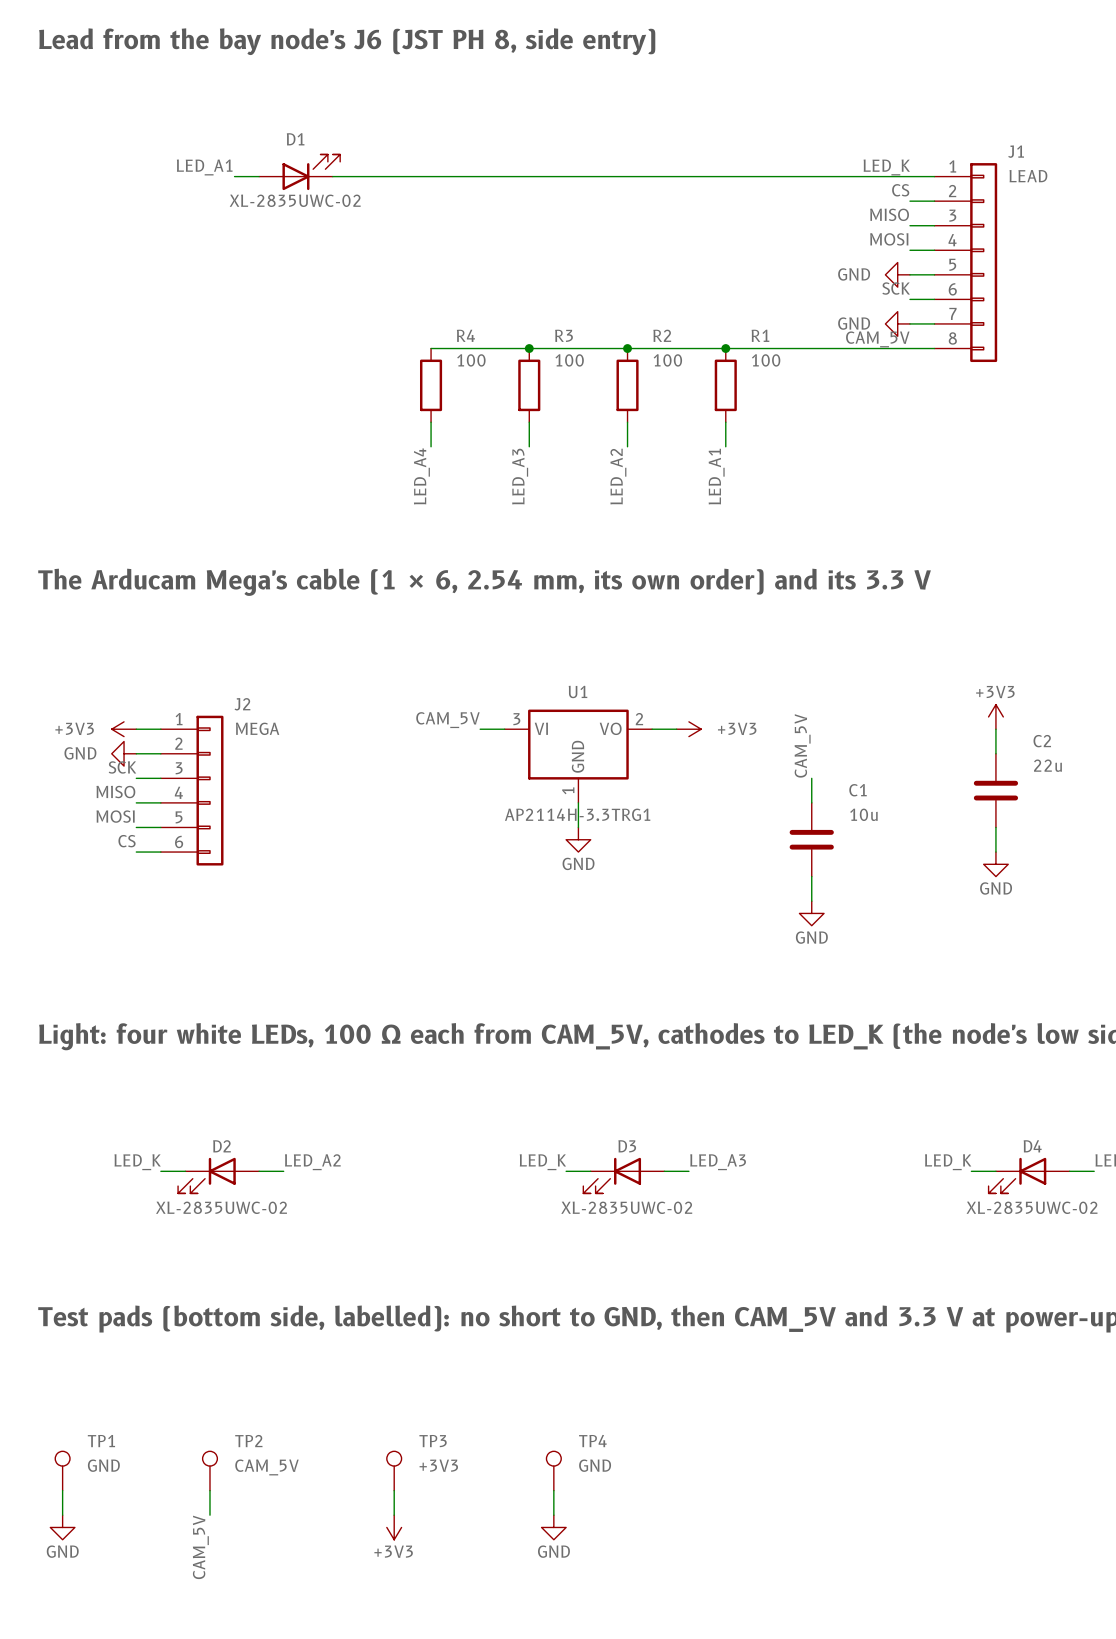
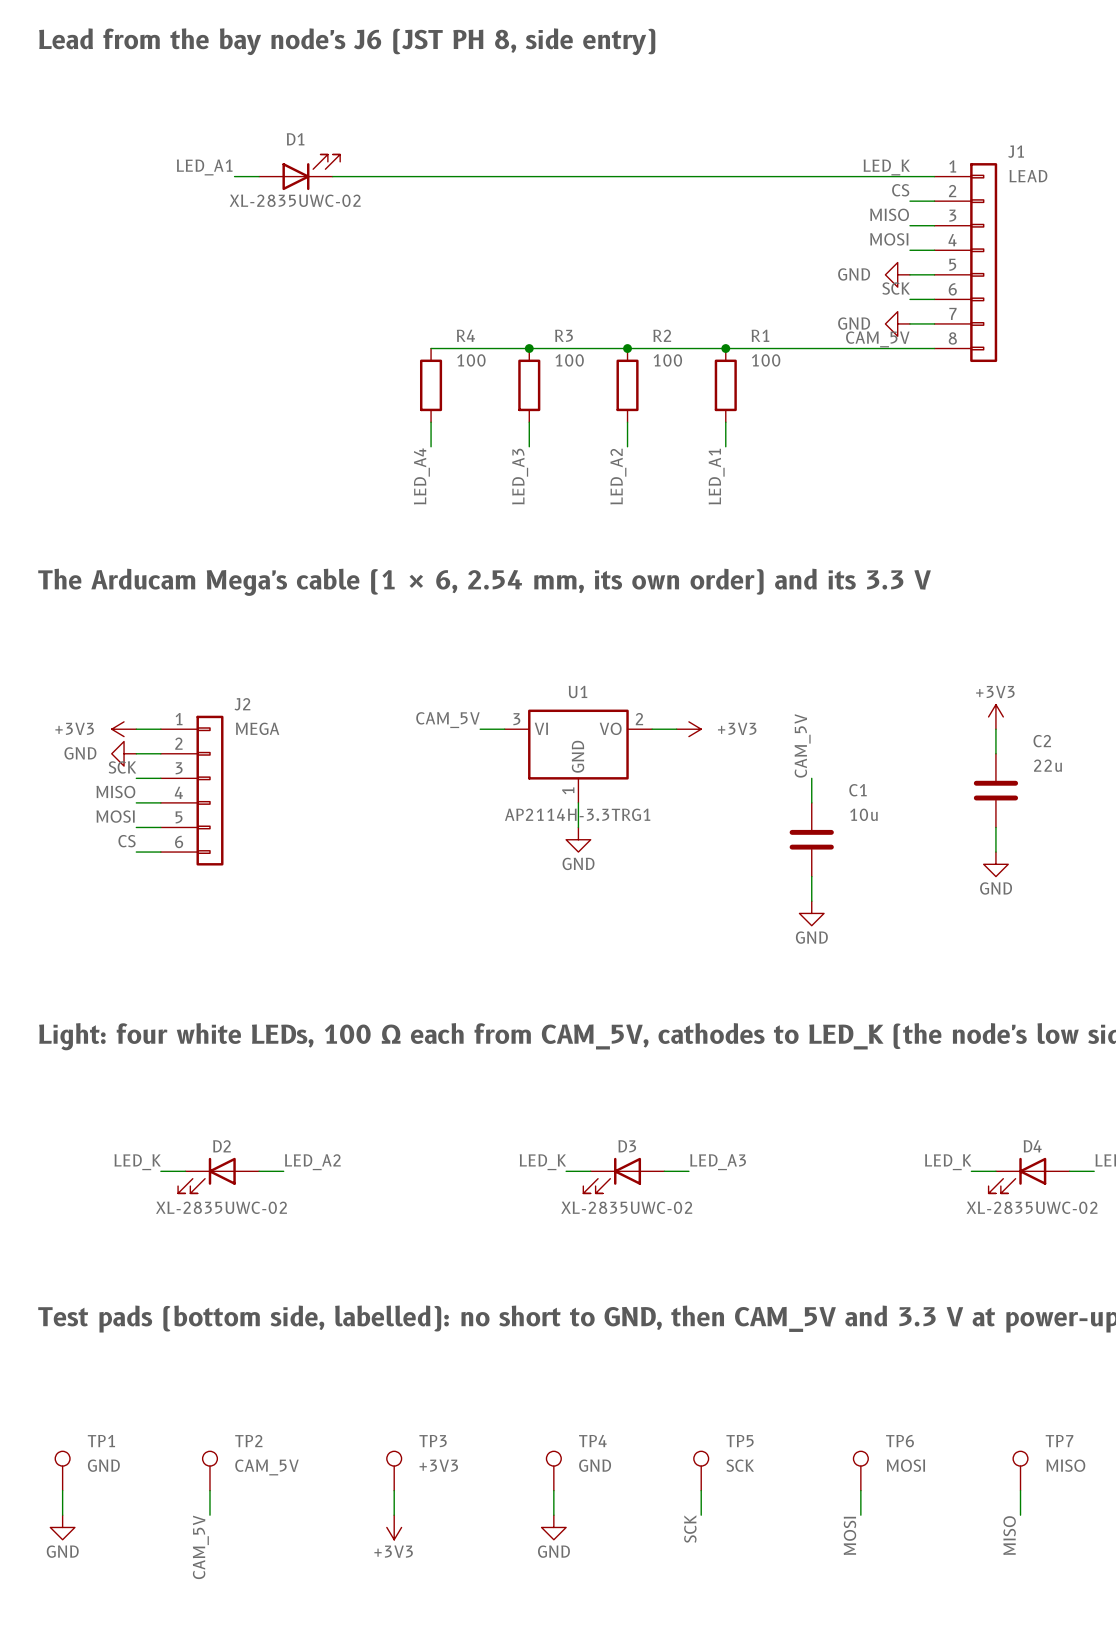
TP5: none -> SCK (701, 1470)
TP6: none -> MOSI (860, 1470)
TP7: none -> MISO (1020, 1470)
wire: none -> (701, 1490) (701, 1515)
wire: none -> (860, 1490) (860, 1515)
wire: none -> (1020, 1490) (1020, 1515)
label: none -> SCK (690, 1529)
label: none -> MOSI (849, 1535)
label: none -> MISO (1009, 1535)

